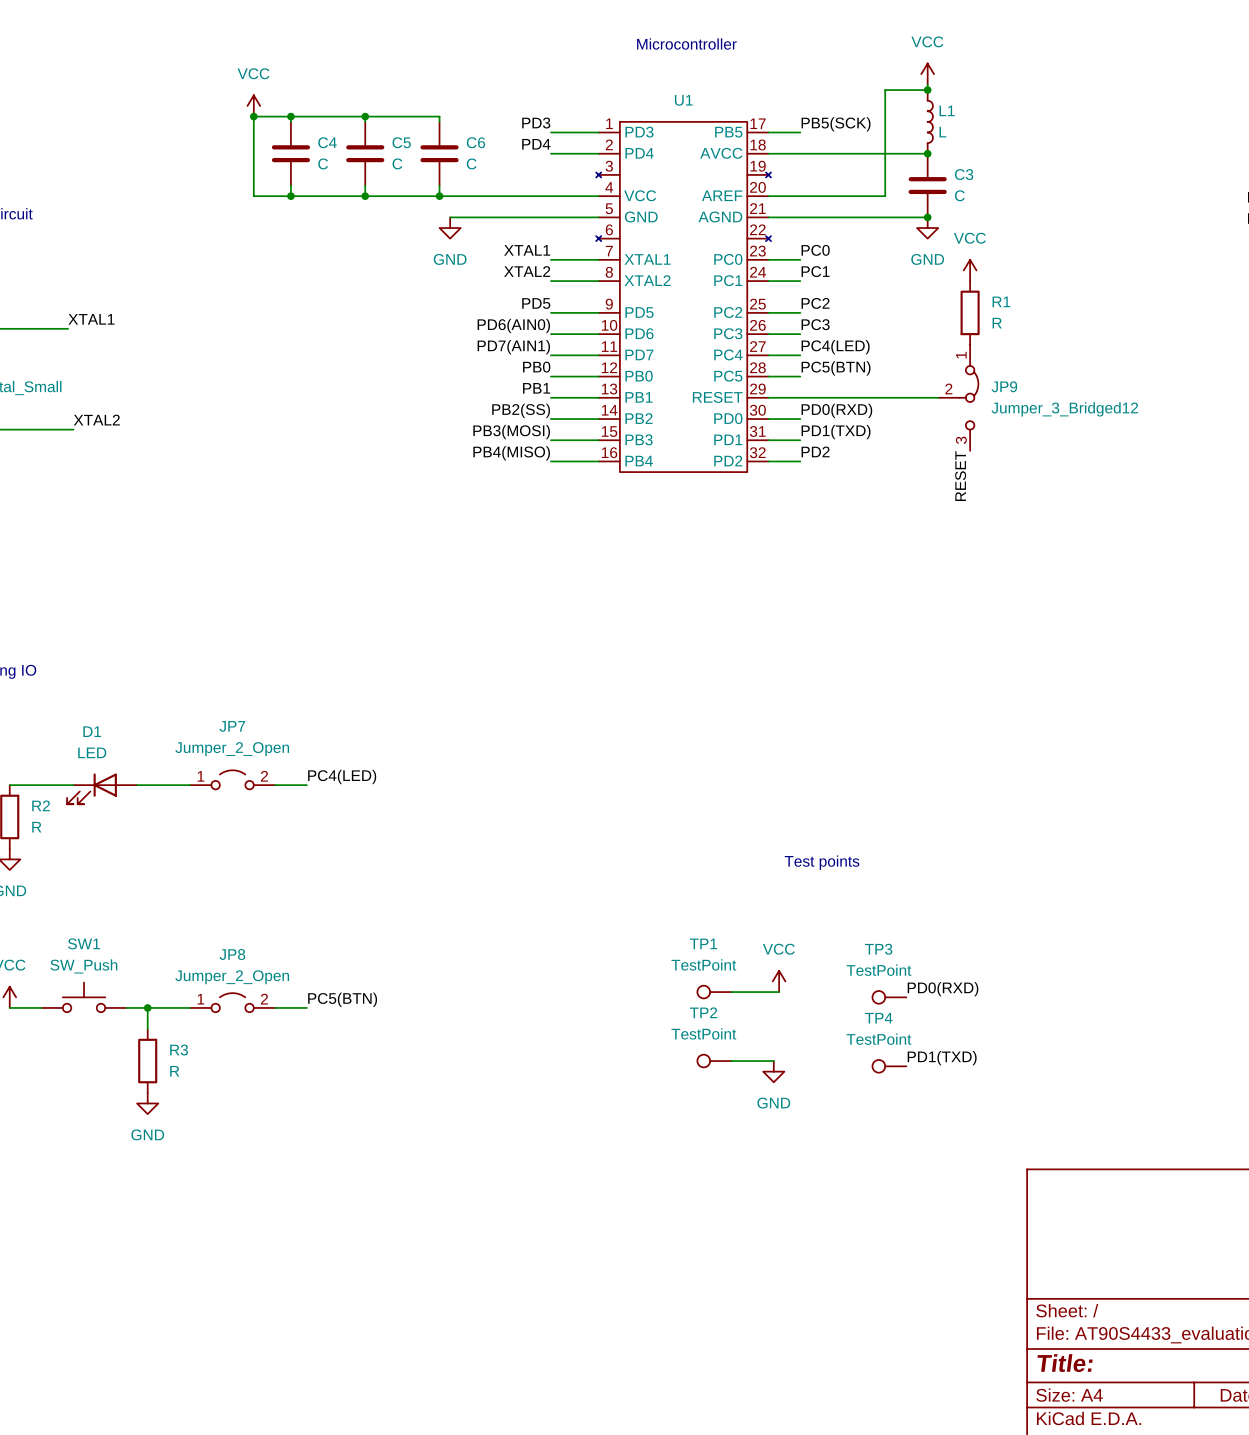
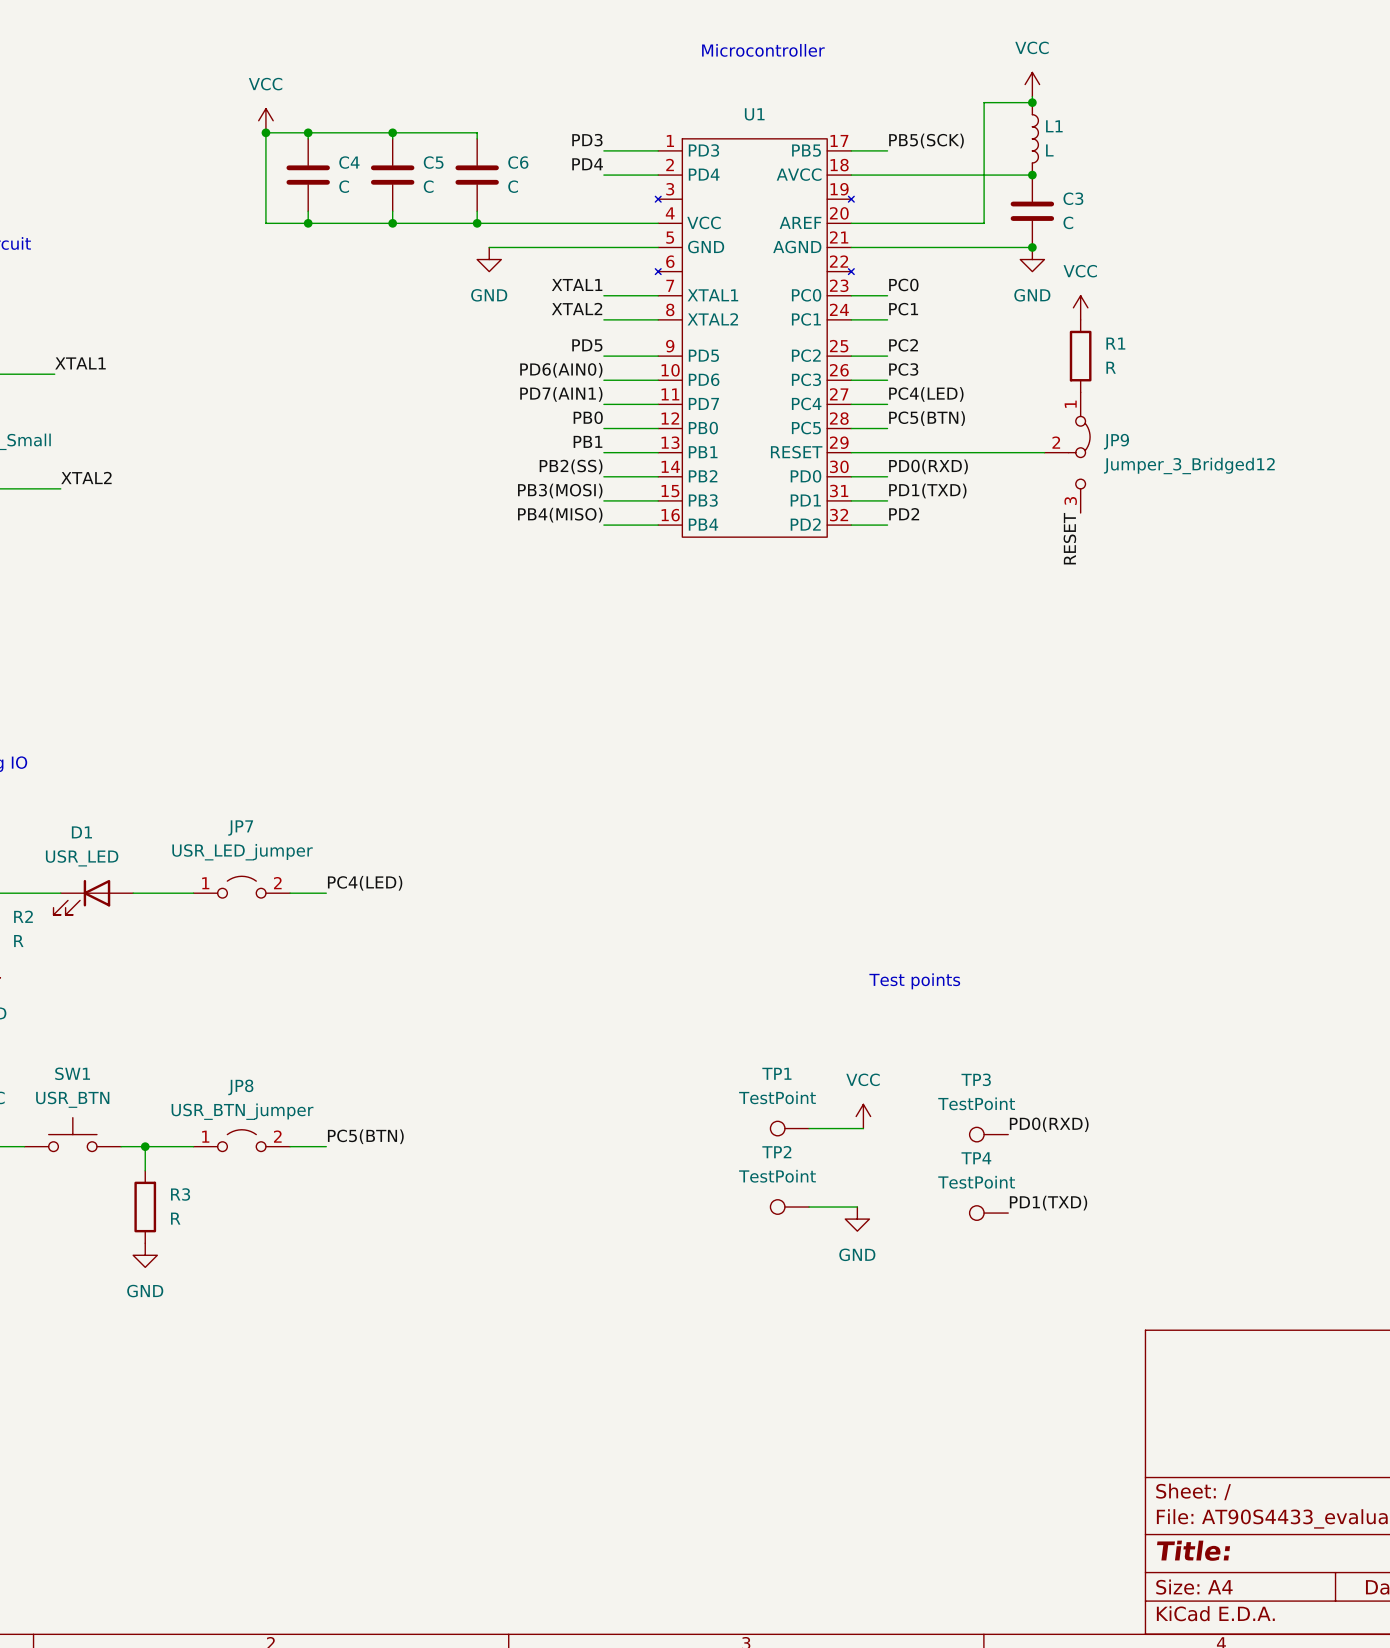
JP7 value: Jumper_2_Open (232, 749) -> USR_LED_jumper (242, 852)
D1 value: LED (92, 752) -> USR_LED (82, 858)
SW1 value: SW_Push (83, 966) -> USR_BTN (72, 1099)
JP8 value: Jumper_2_Open (232, 977) -> USR_BTN_jumper (242, 1111)

